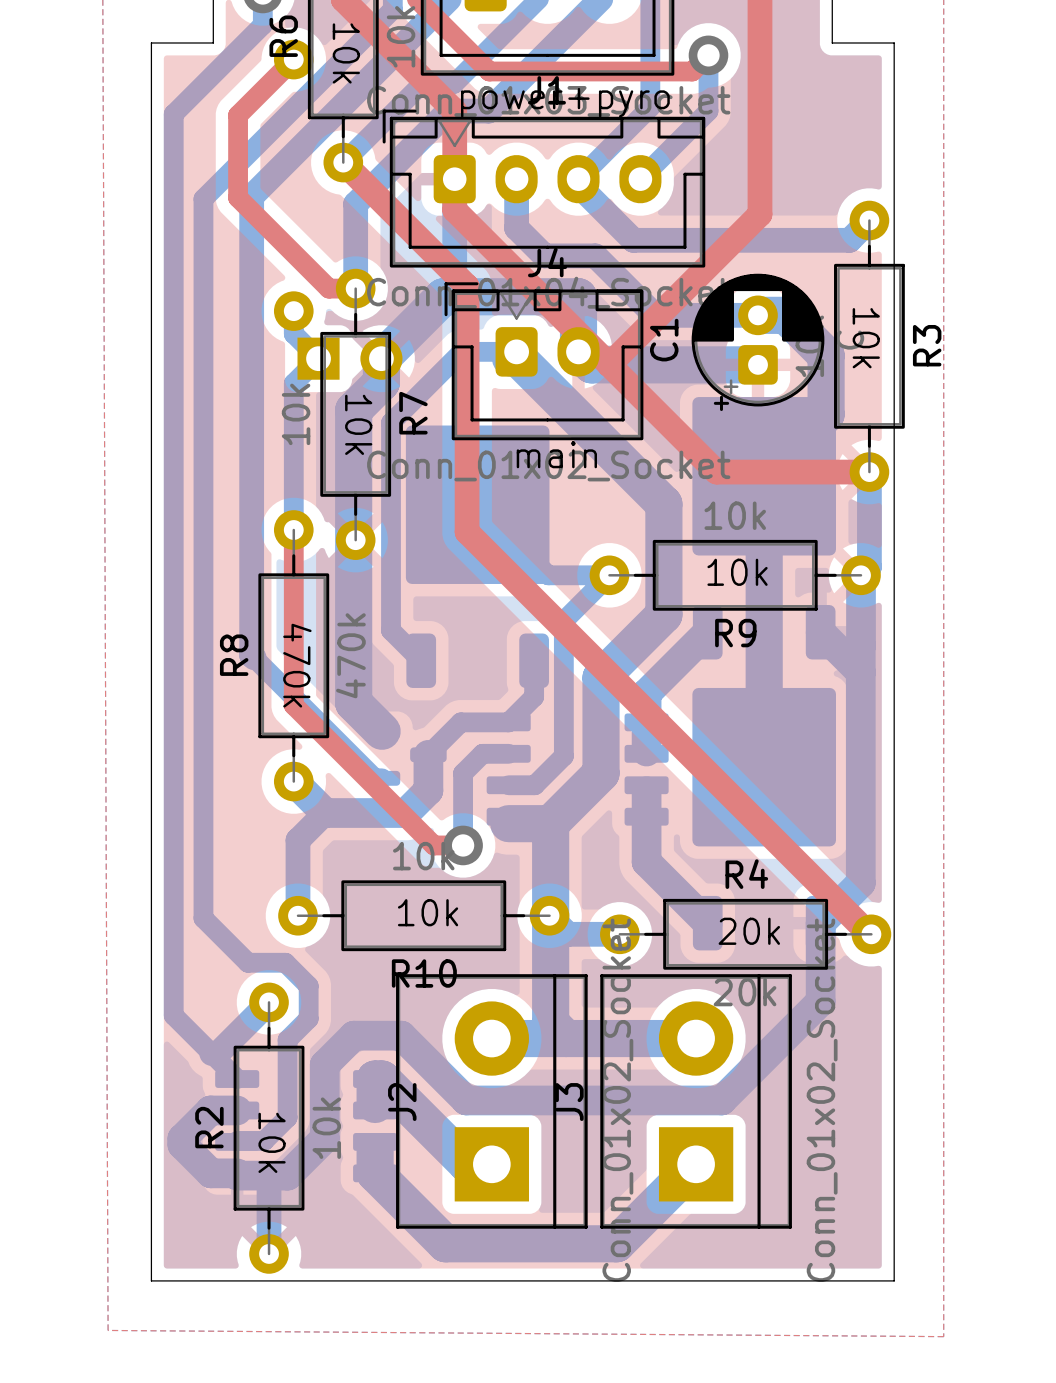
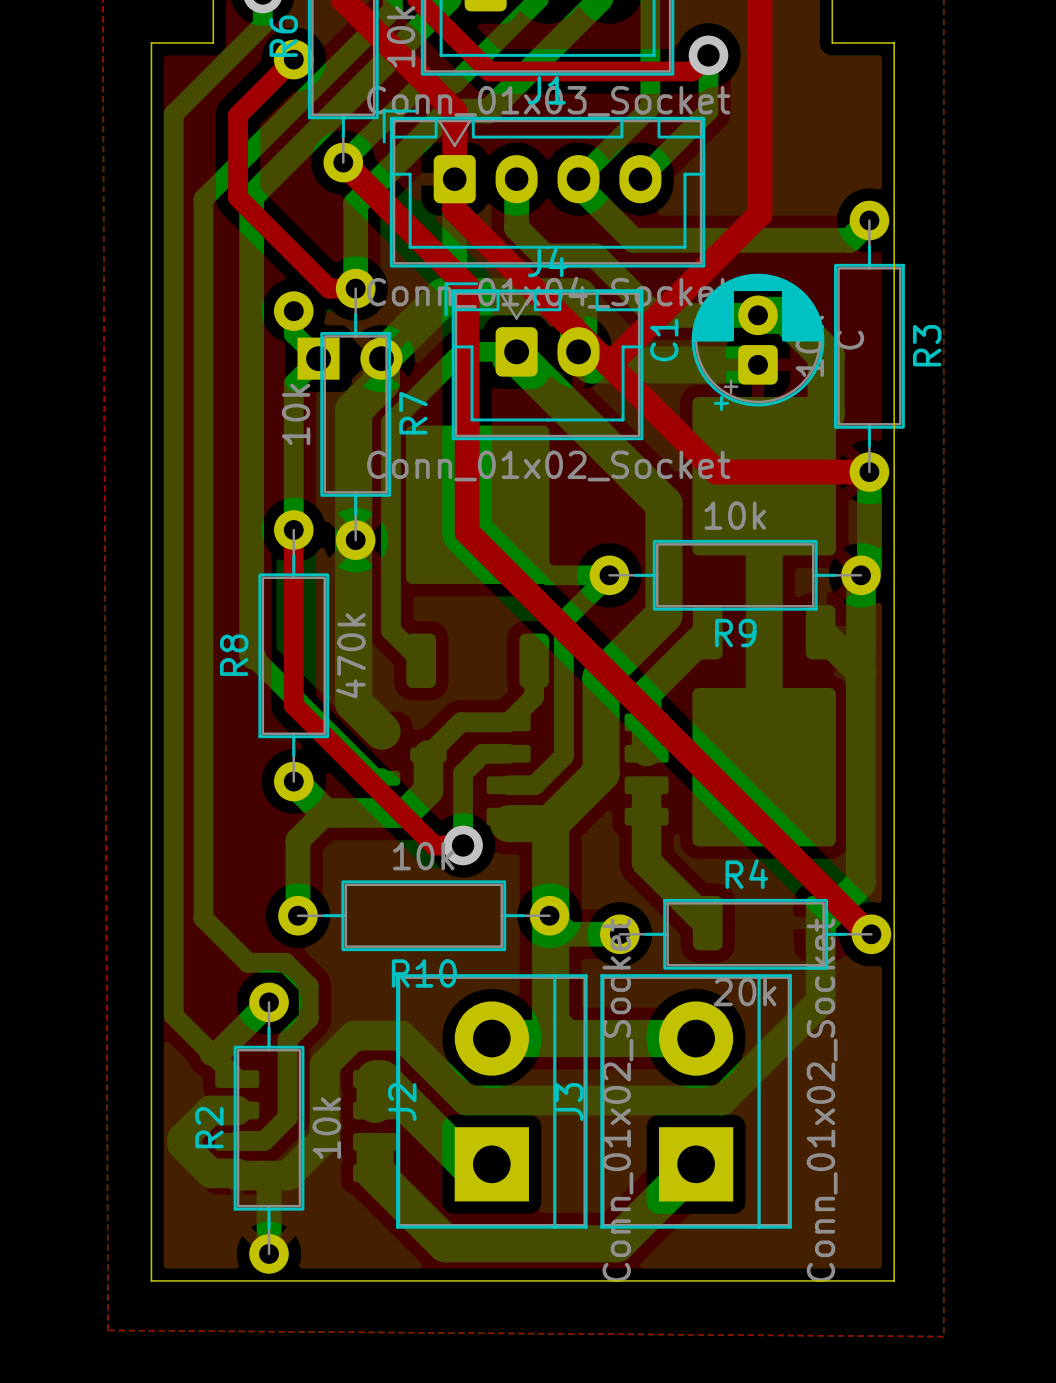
text: 10k (346, 53) -> none
text: power+pyro (565, 102) -> none
text: 10k (866, 338) -> none
text: 10k (358, 424) -> none
text: main (556, 454) -> none
text: 10k (737, 572) -> none
text: 470k (297, 665) -> none
text: 10k (428, 912) -> none
text: 20k (749, 931) -> none
text: 10k (272, 1142) -> none

